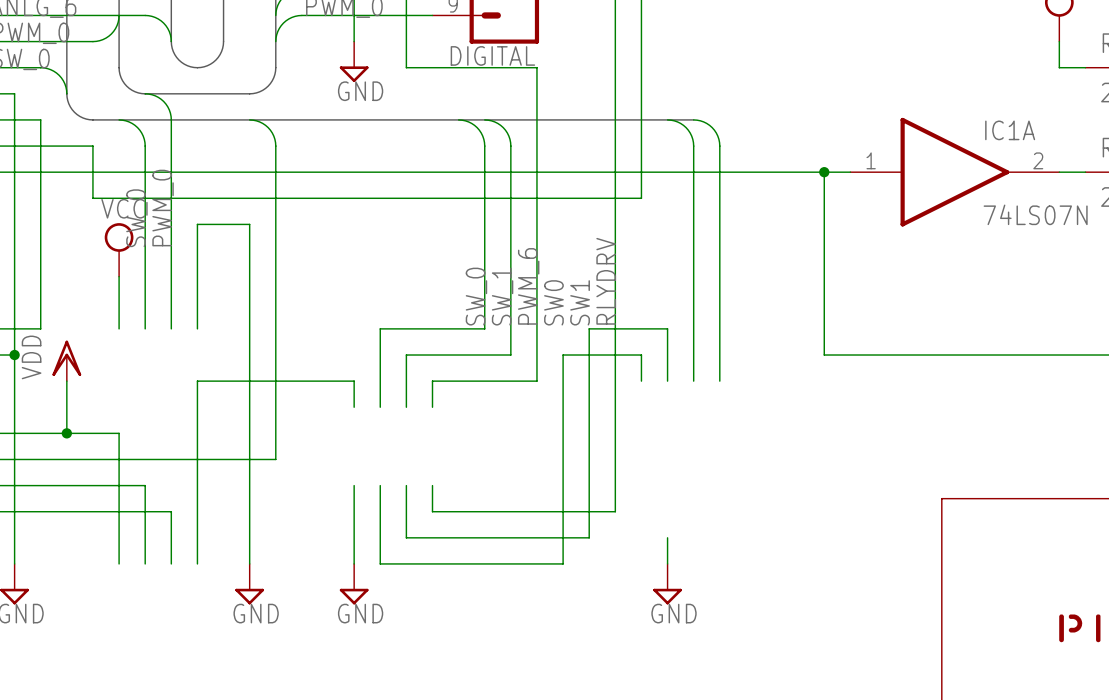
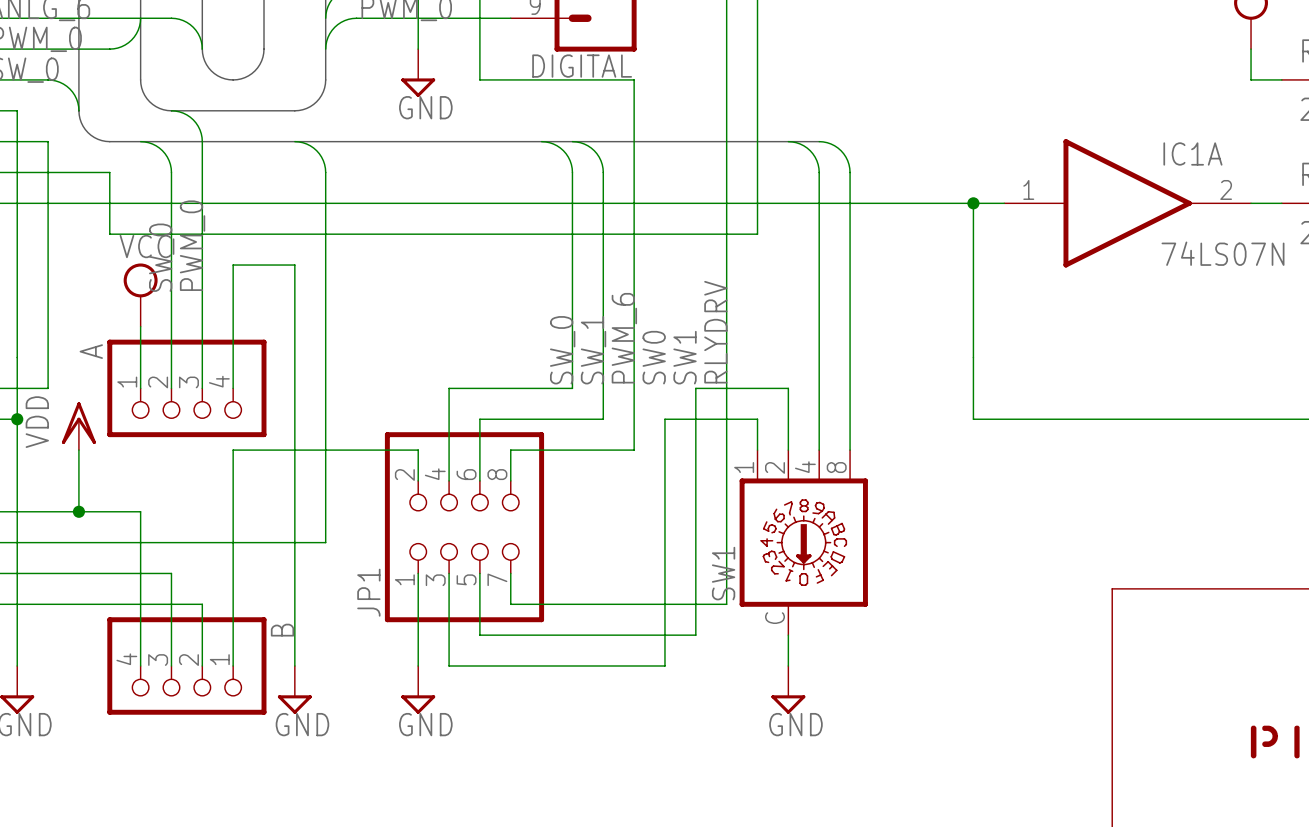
A: none -> (186, 388)
JP1: none -> (464, 527)
SW1: none -> (803, 542)
B: none -> (186, 666)

